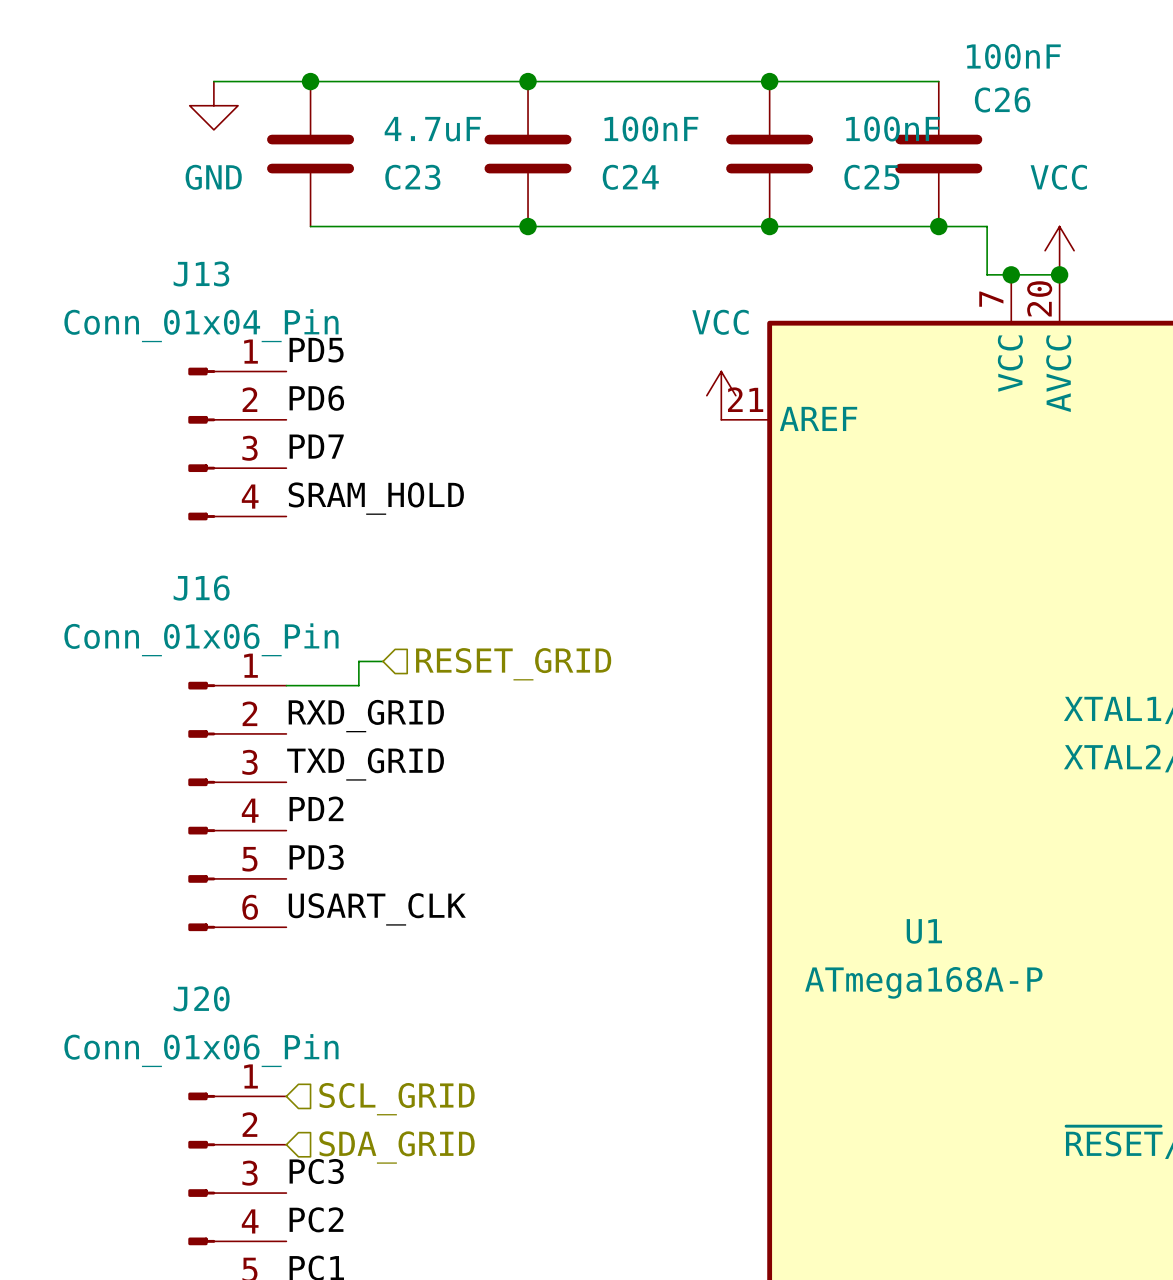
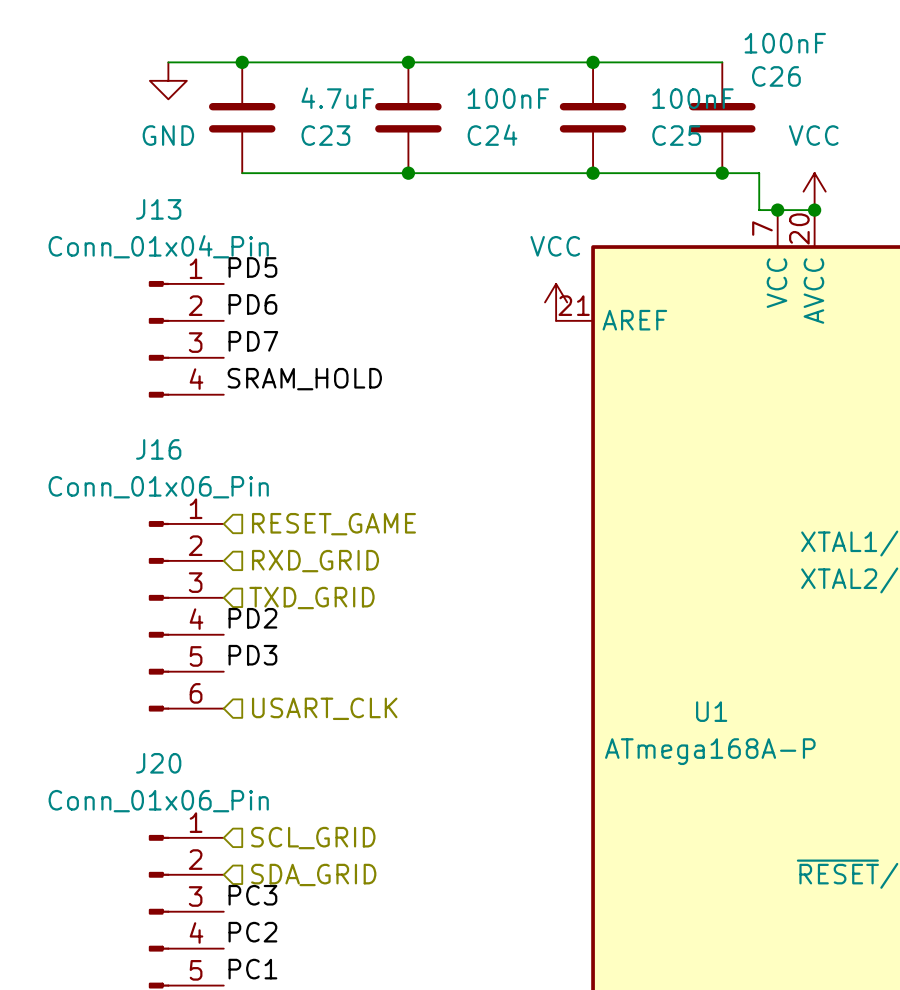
wire: (383, 661) (358, 661) (358, 685) (286, 685) -> none
hierarchical label: RESET_GRID (513, 664) -> RESET_GAME (333, 524)
label: RXD_GRID (366, 716) -> none
hierarchical label: none -> RXD_GRID (315, 561)
label: TXD_GRID (365, 764) -> none
hierarchical label: none -> TXD_GRID (311, 598)
label: USART_CLK (377, 909) -> none
hierarchical label: none -> USART_CLK (324, 708)

